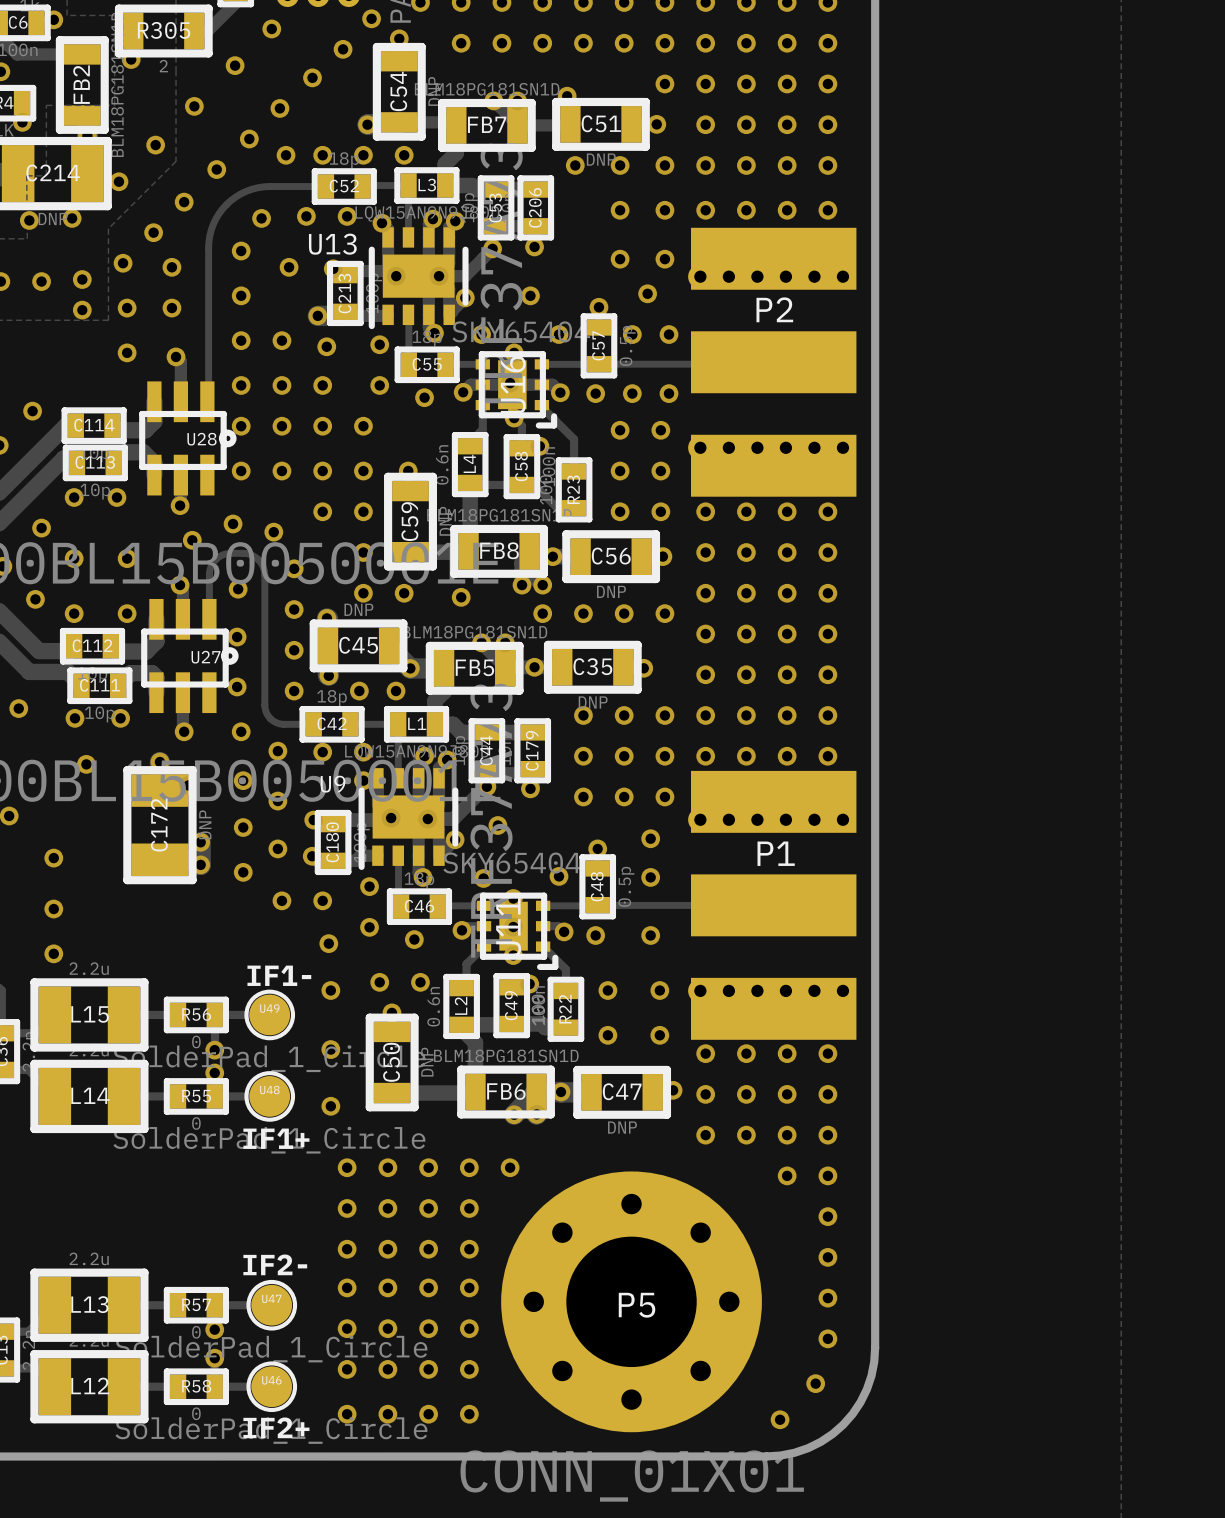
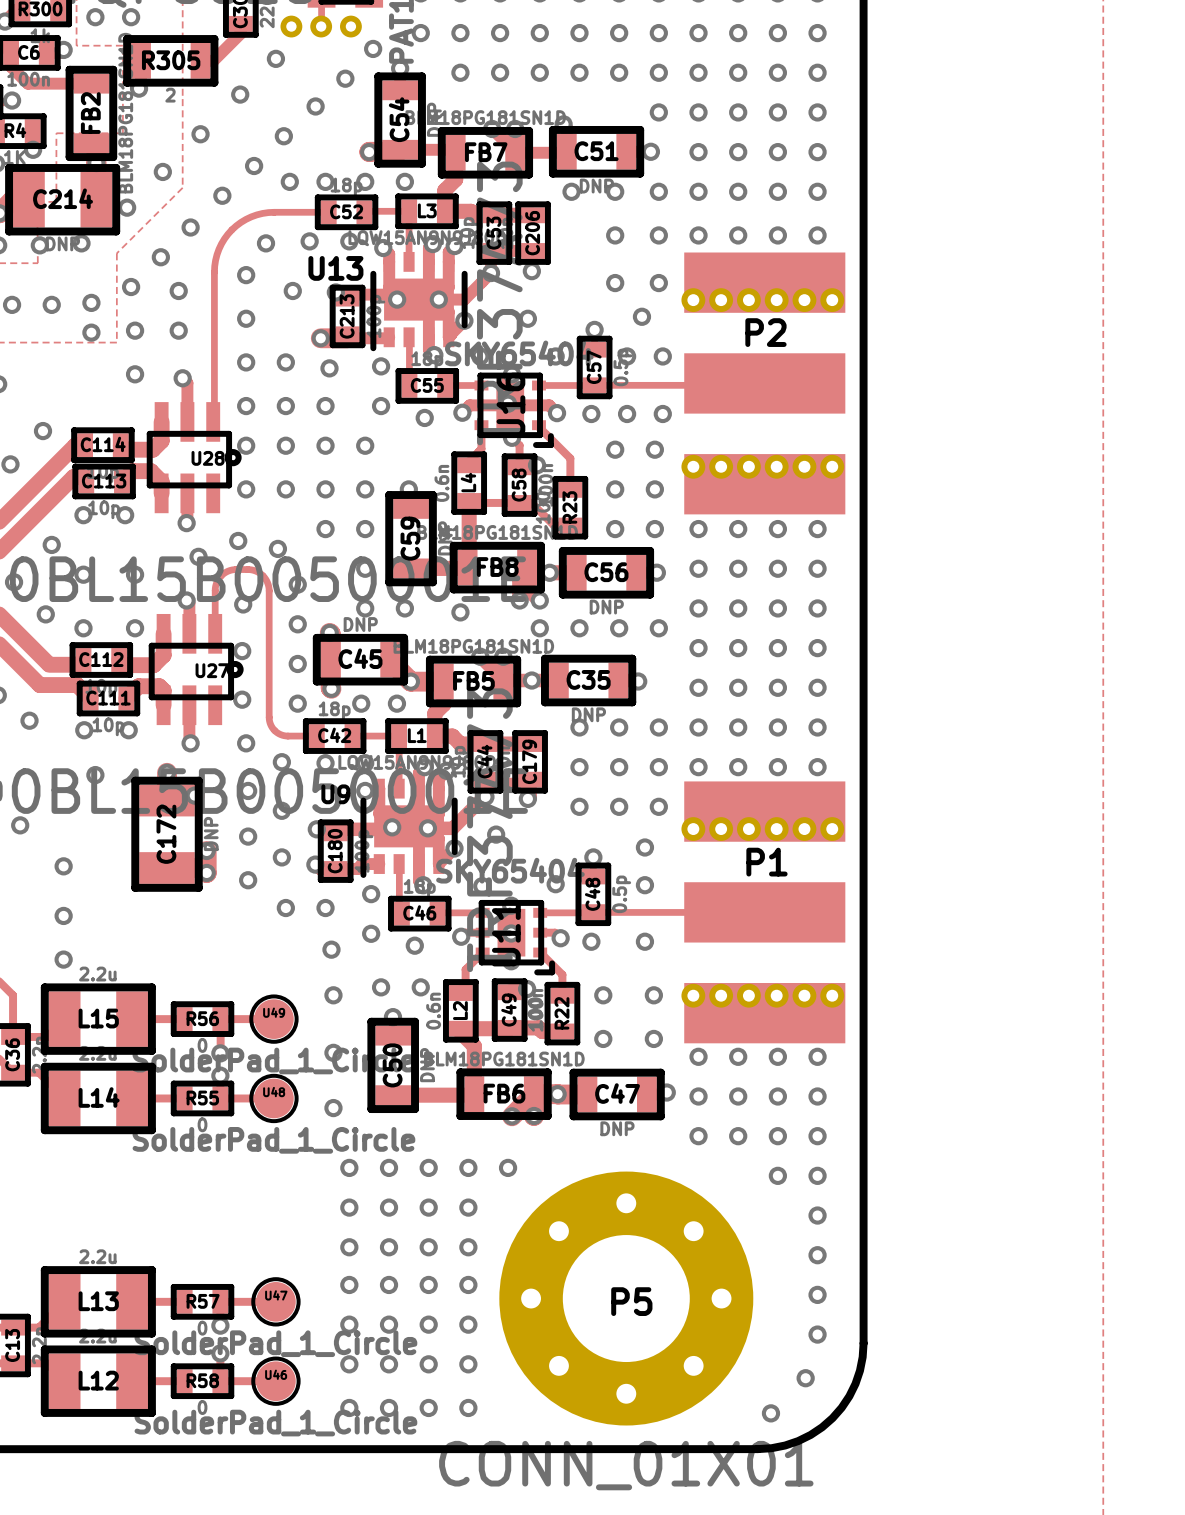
text: IF1- (279, 975) -> none
text: IF1+ (276, 1138) -> none
text: IF2- (275, 1264) -> none
text: IF2+ (276, 1427) -> none

